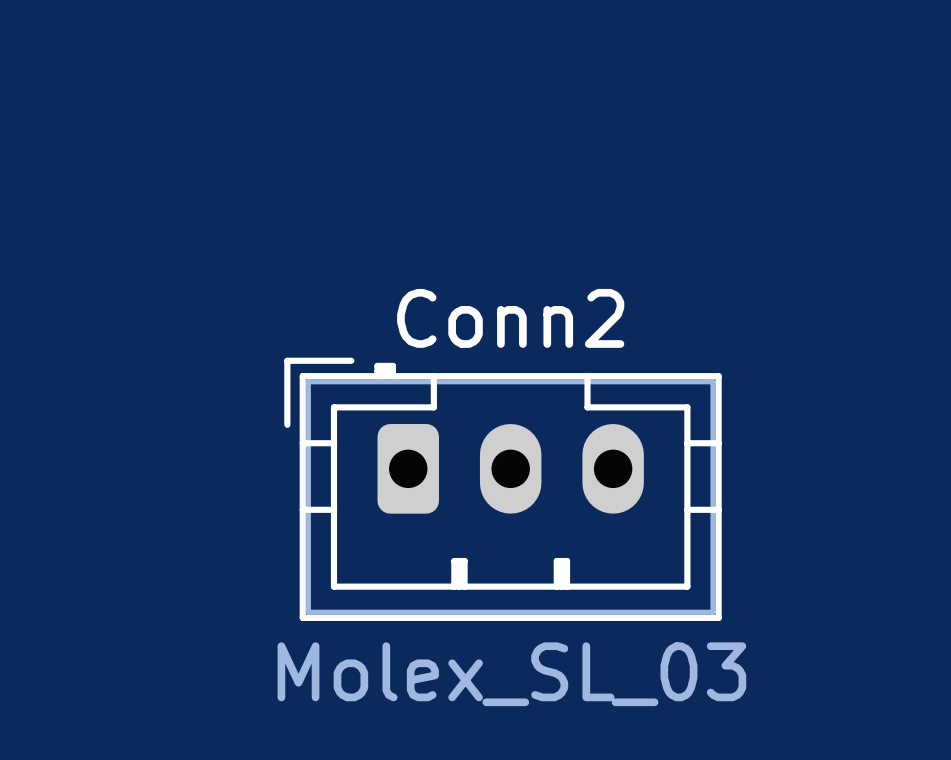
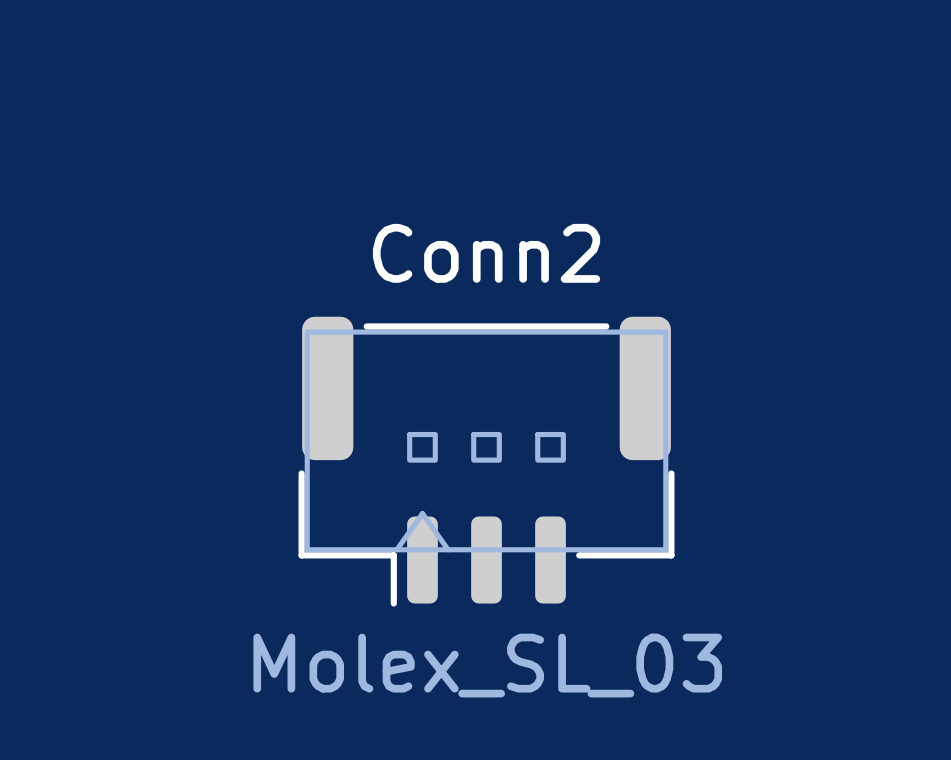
Conn2 footprint: [284, 357, 722, 621] -> [298, 316, 675, 607]

